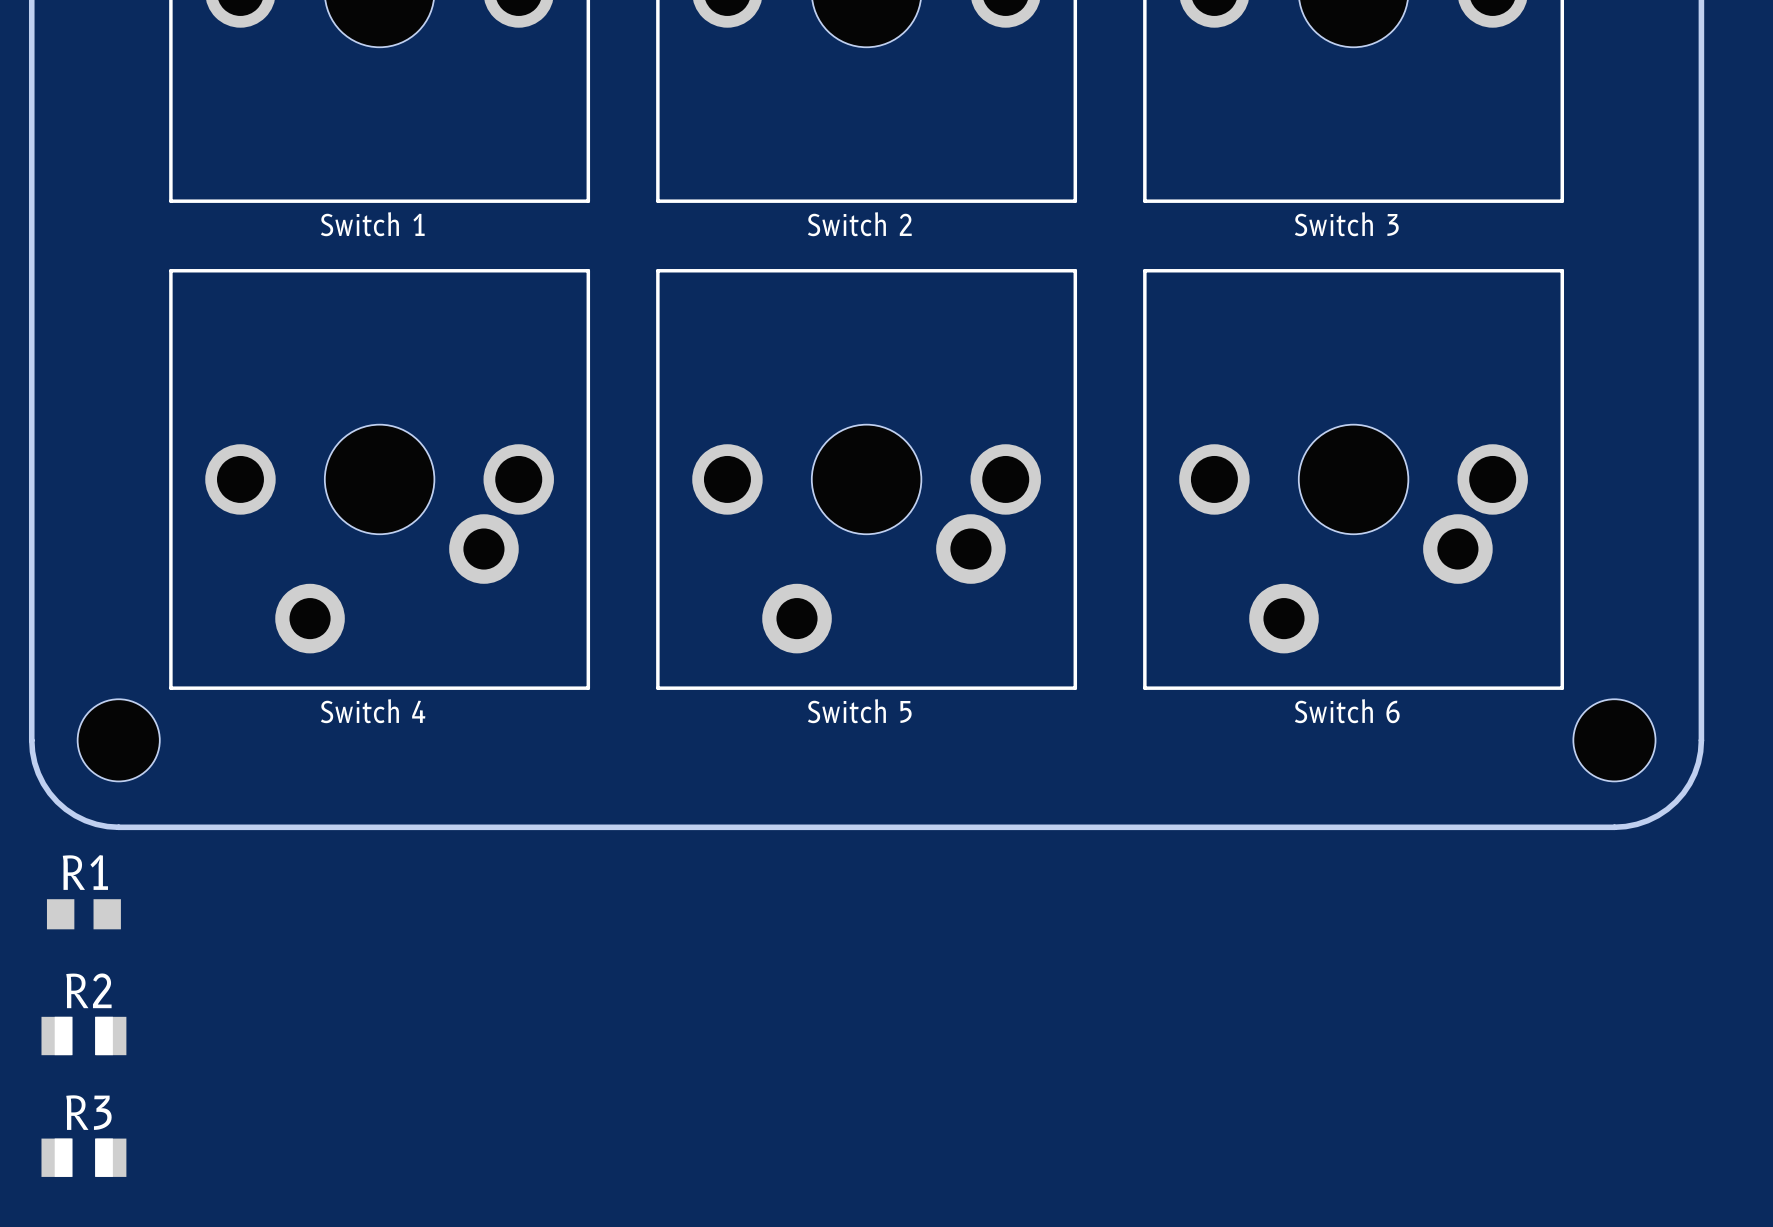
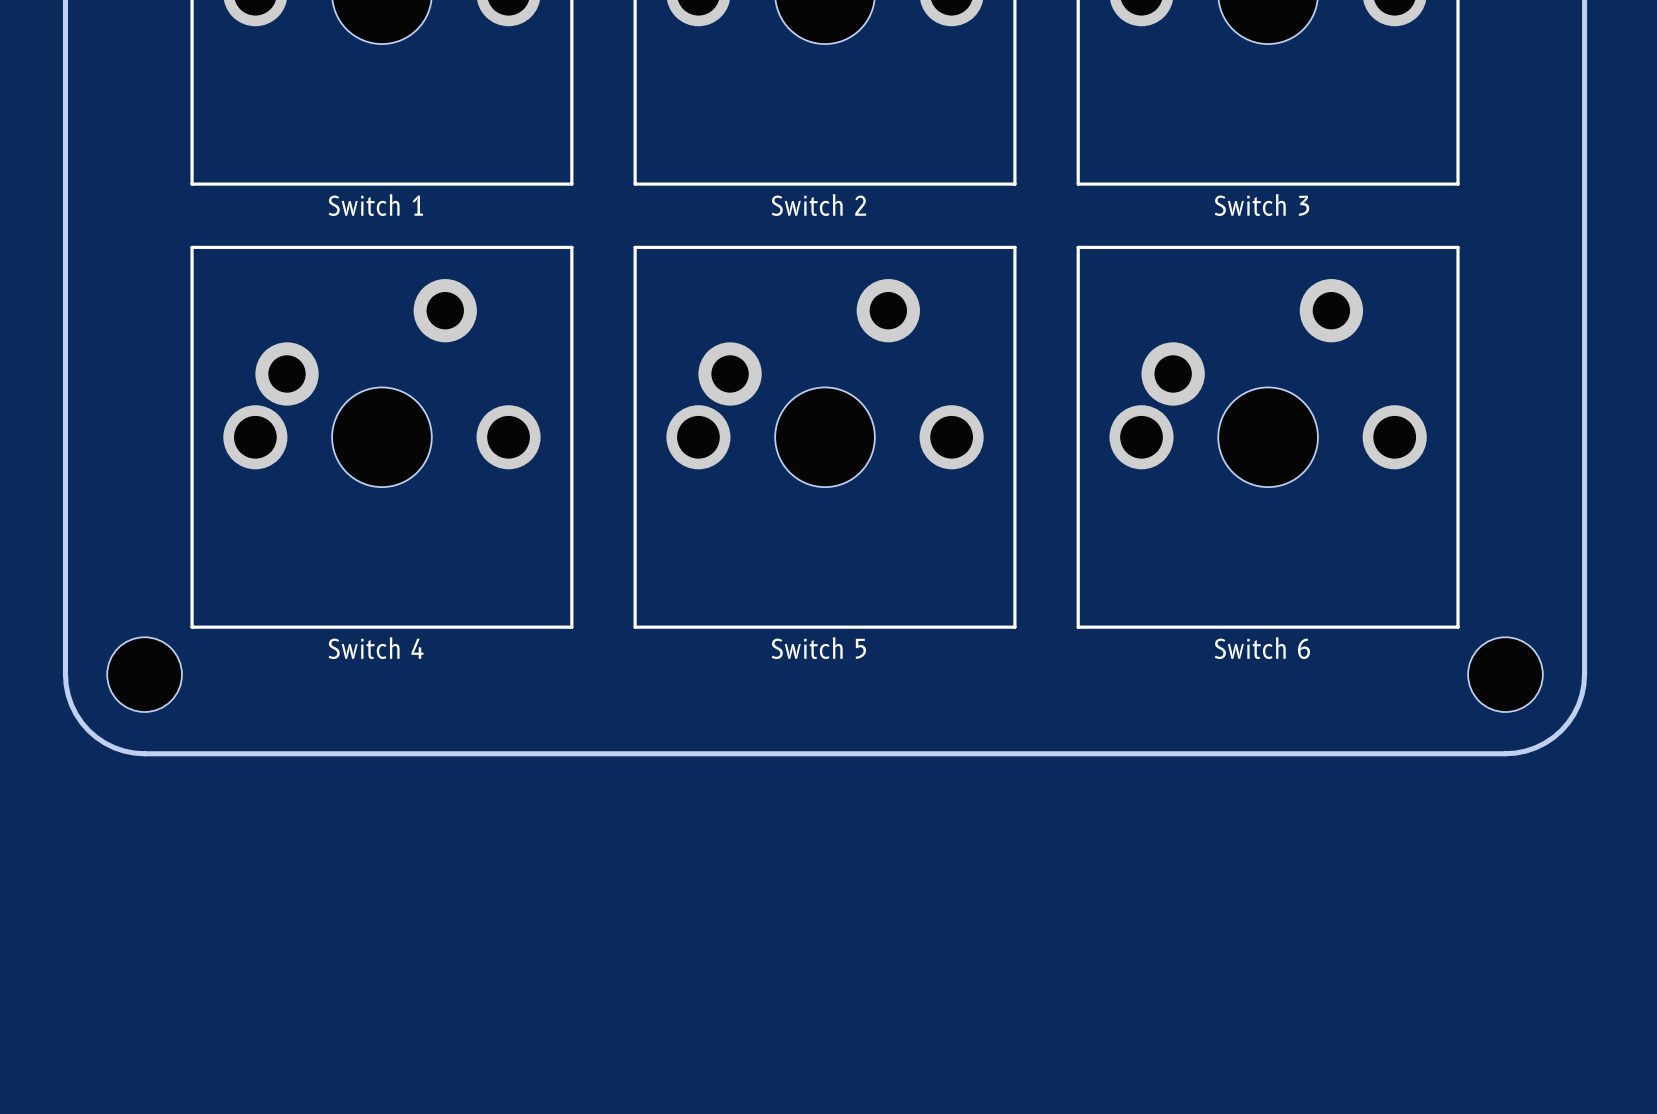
part rotation: 0° (379, 479) -> 180° (381, 437)
part rotation: 0° (866, 479) -> 180° (825, 437)
part rotation: 0° (1353, 479) -> 180° (1268, 437)
R1: (83, 914) -> none
R2: (83, 1035) -> none
R3: (83, 1157) -> none

